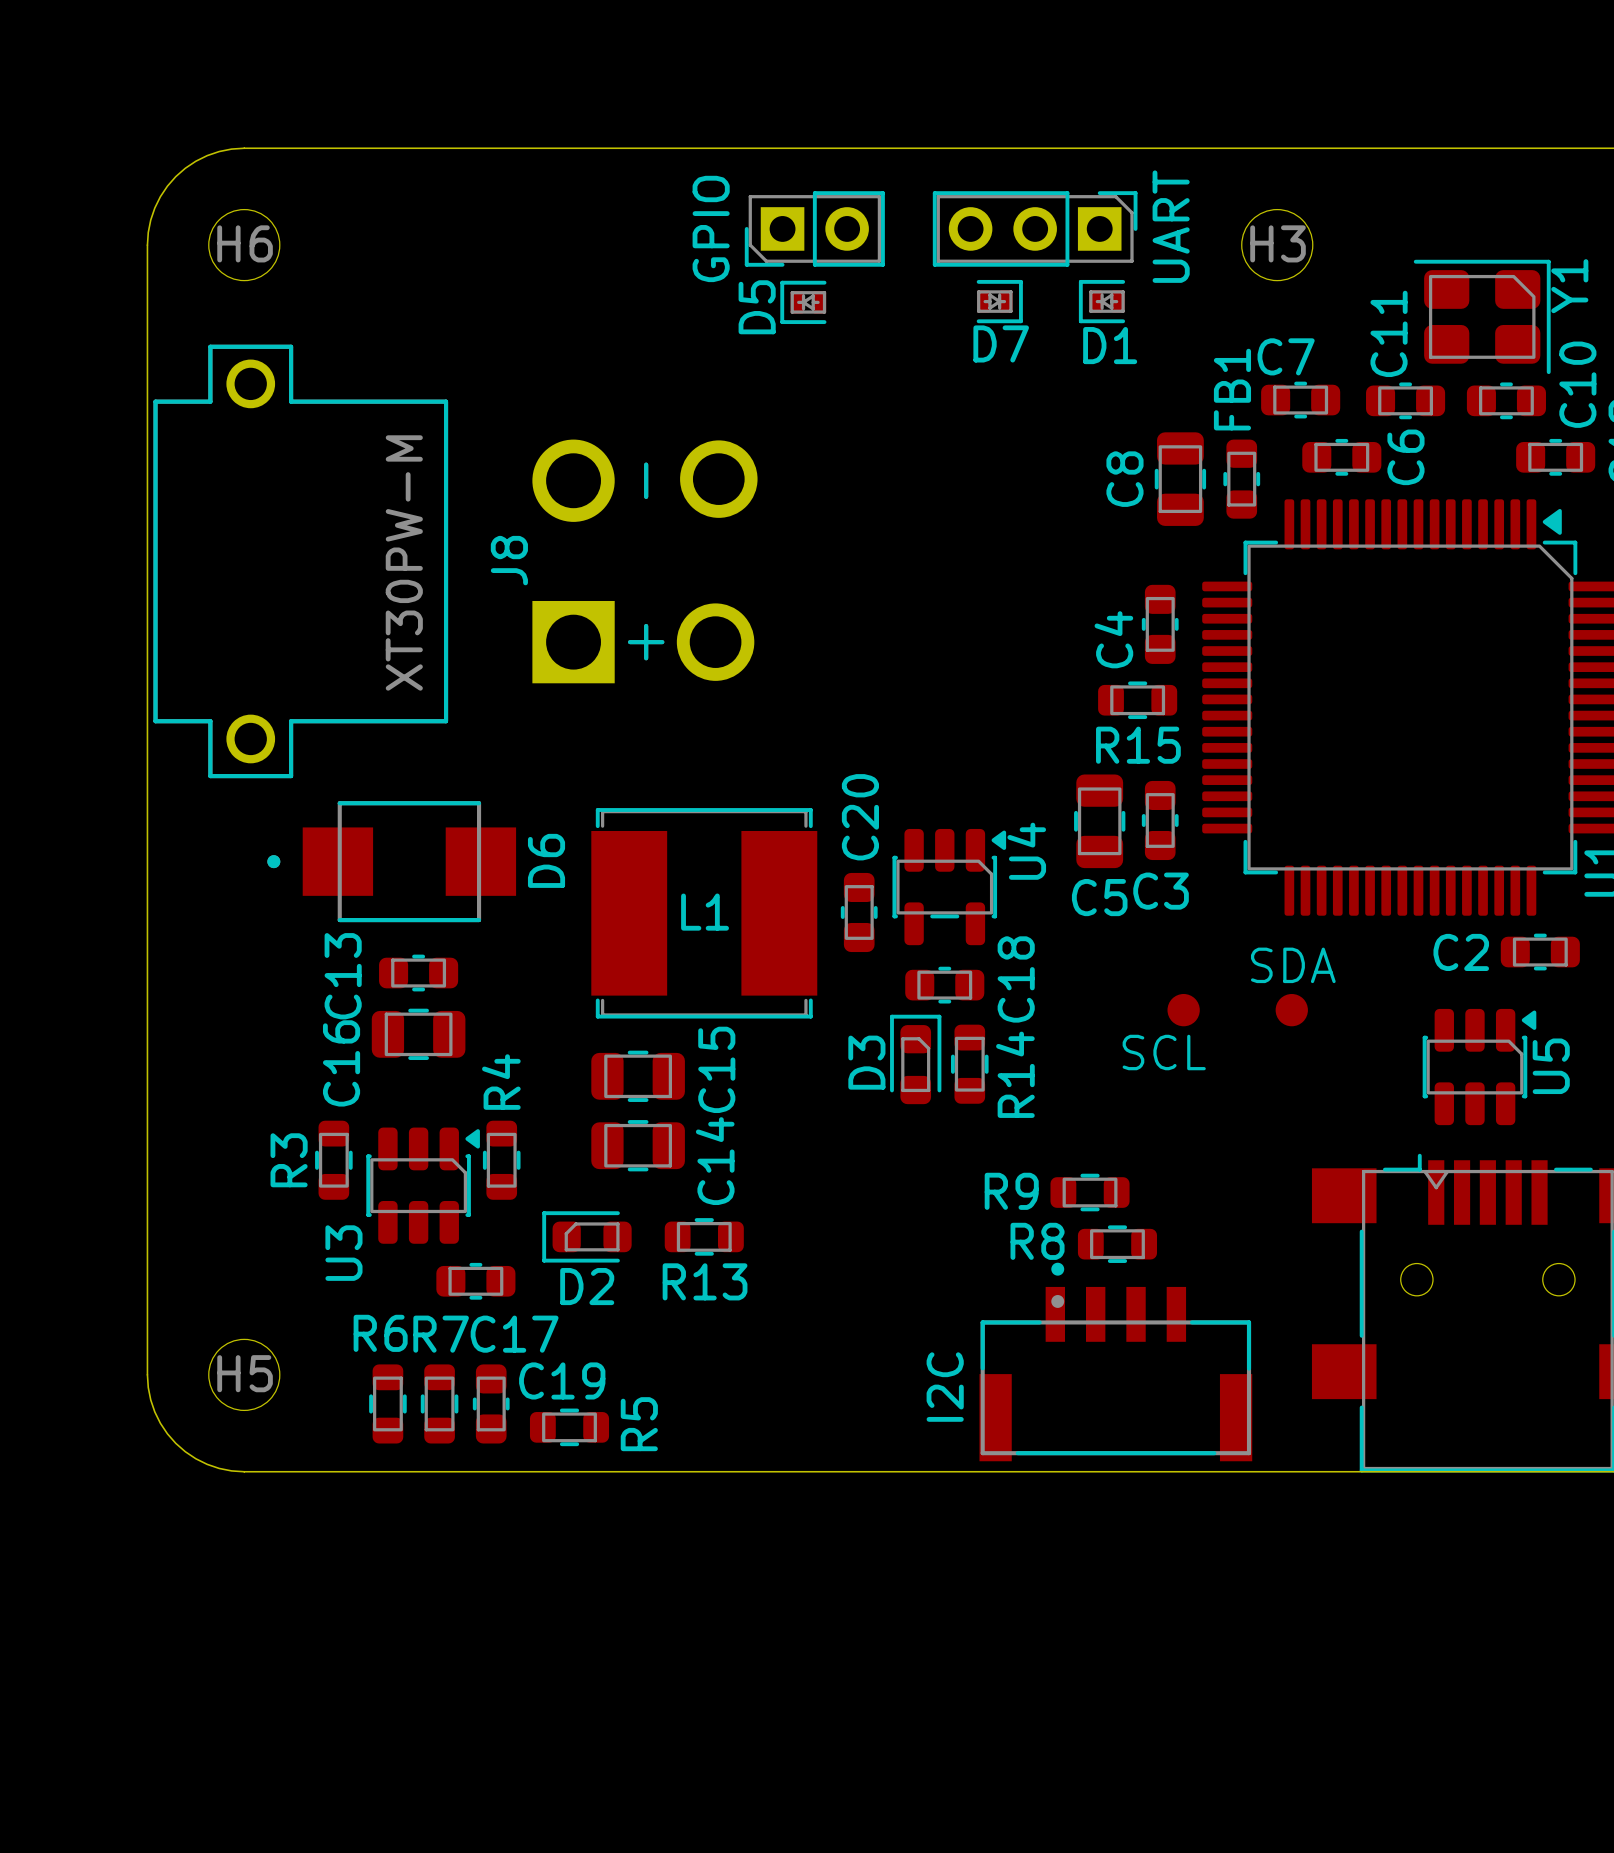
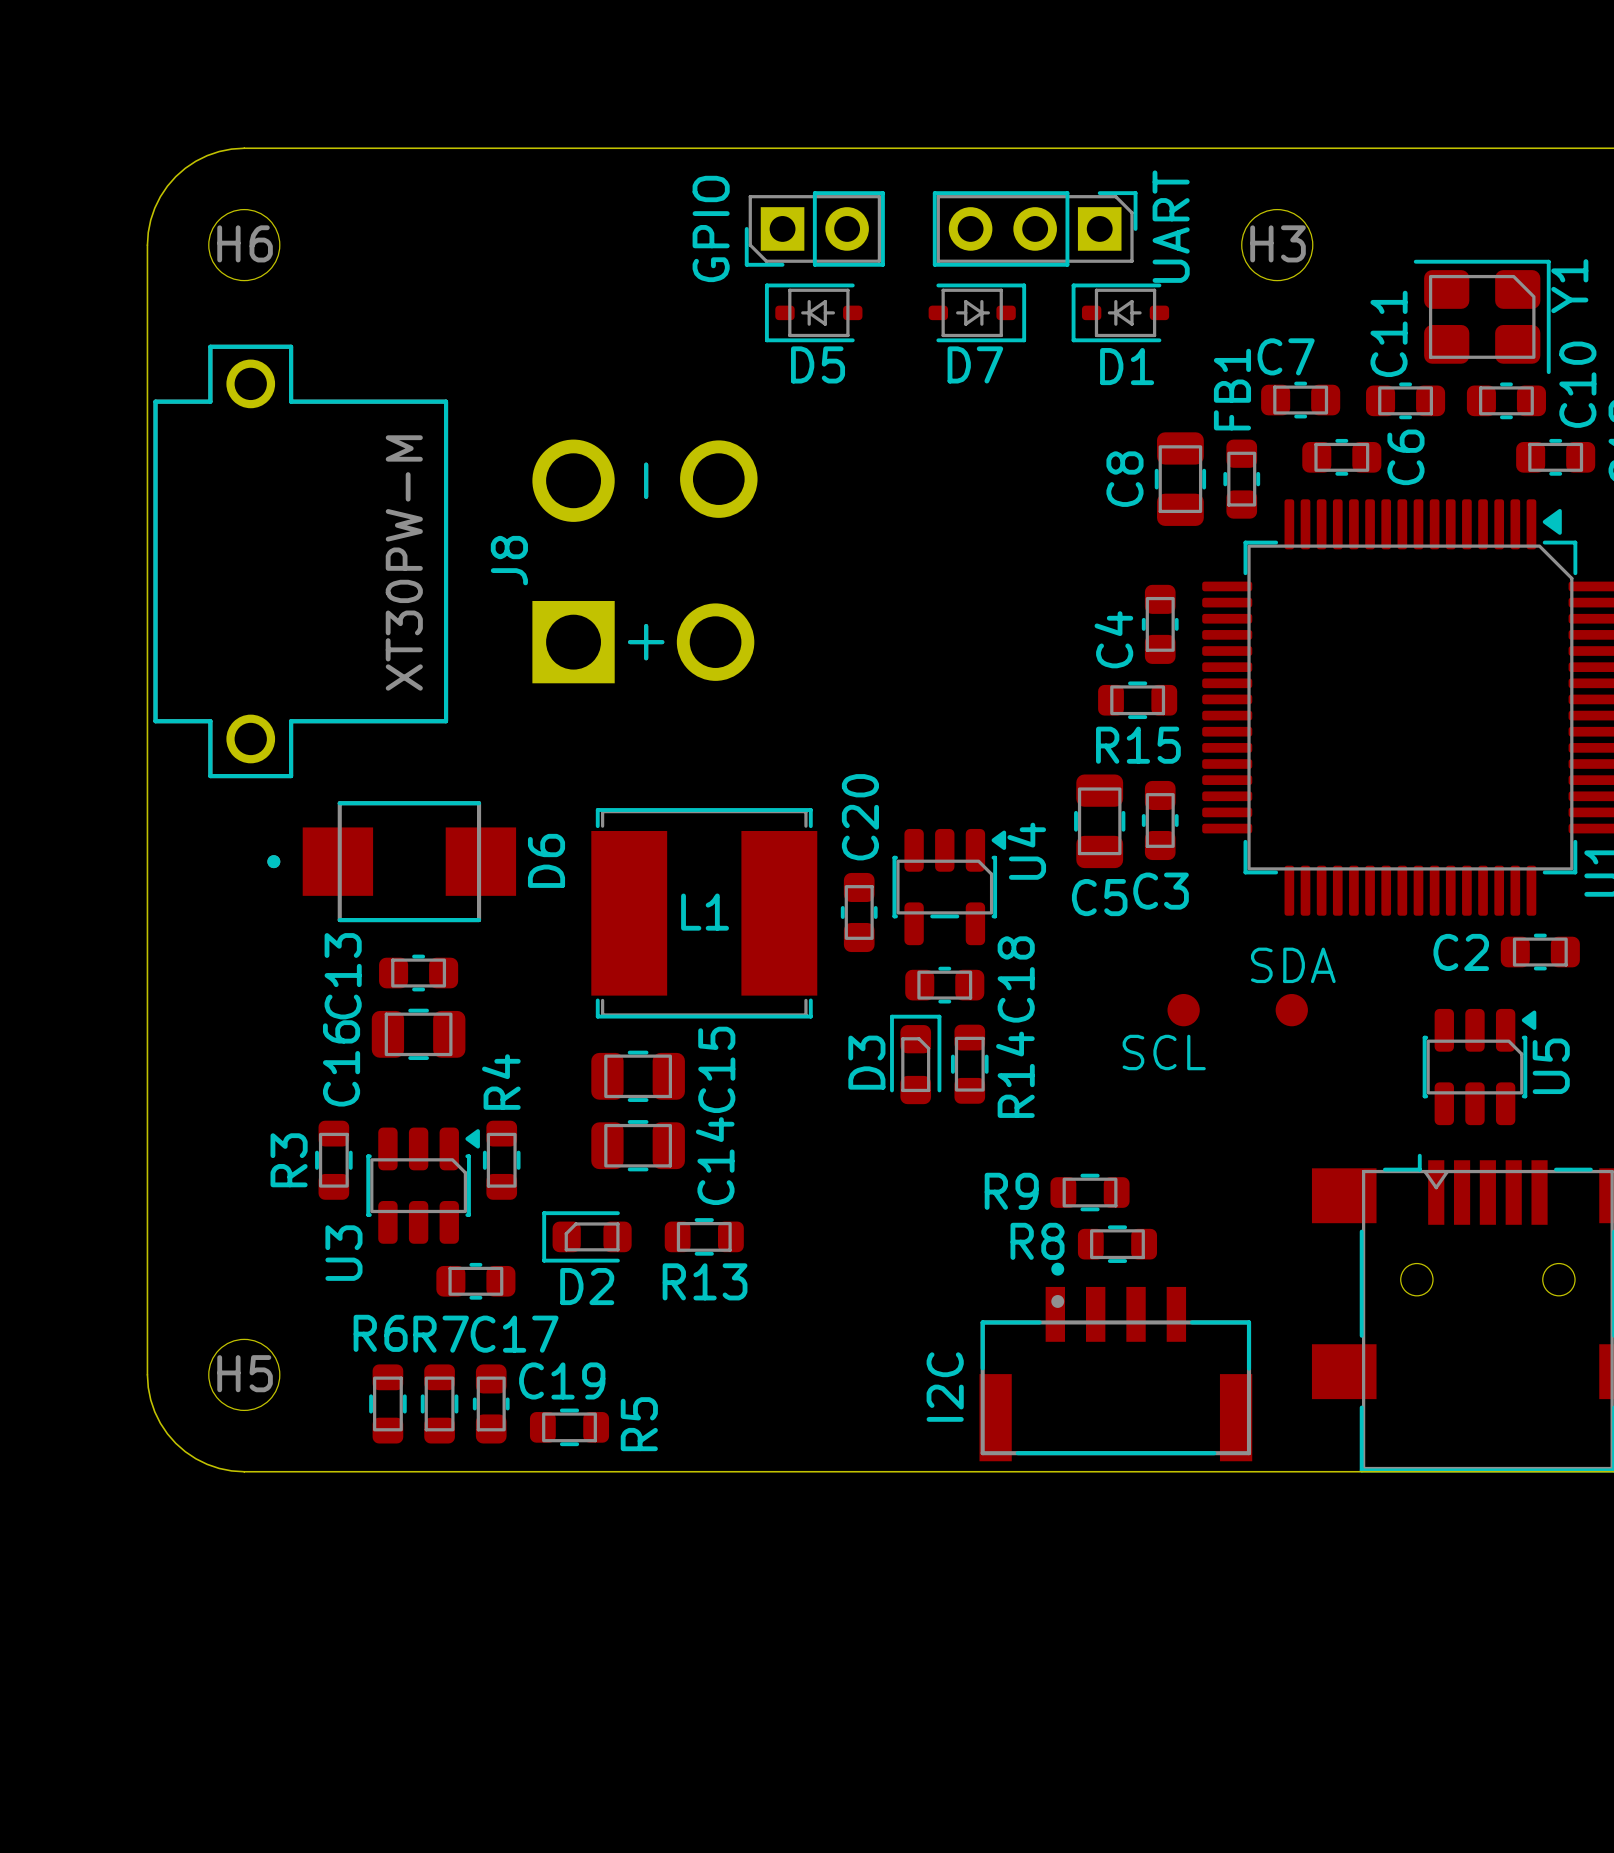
D7 footprint: [976, 279, 1023, 324] -> [928, 283, 1027, 343]
D1 footprint: [1078, 279, 1126, 324] -> [1071, 283, 1170, 343]
D5 footprint: [780, 280, 827, 325] -> [764, 283, 863, 343]
D5 name position: D5 (757, 307) -> D5 (818, 364)

